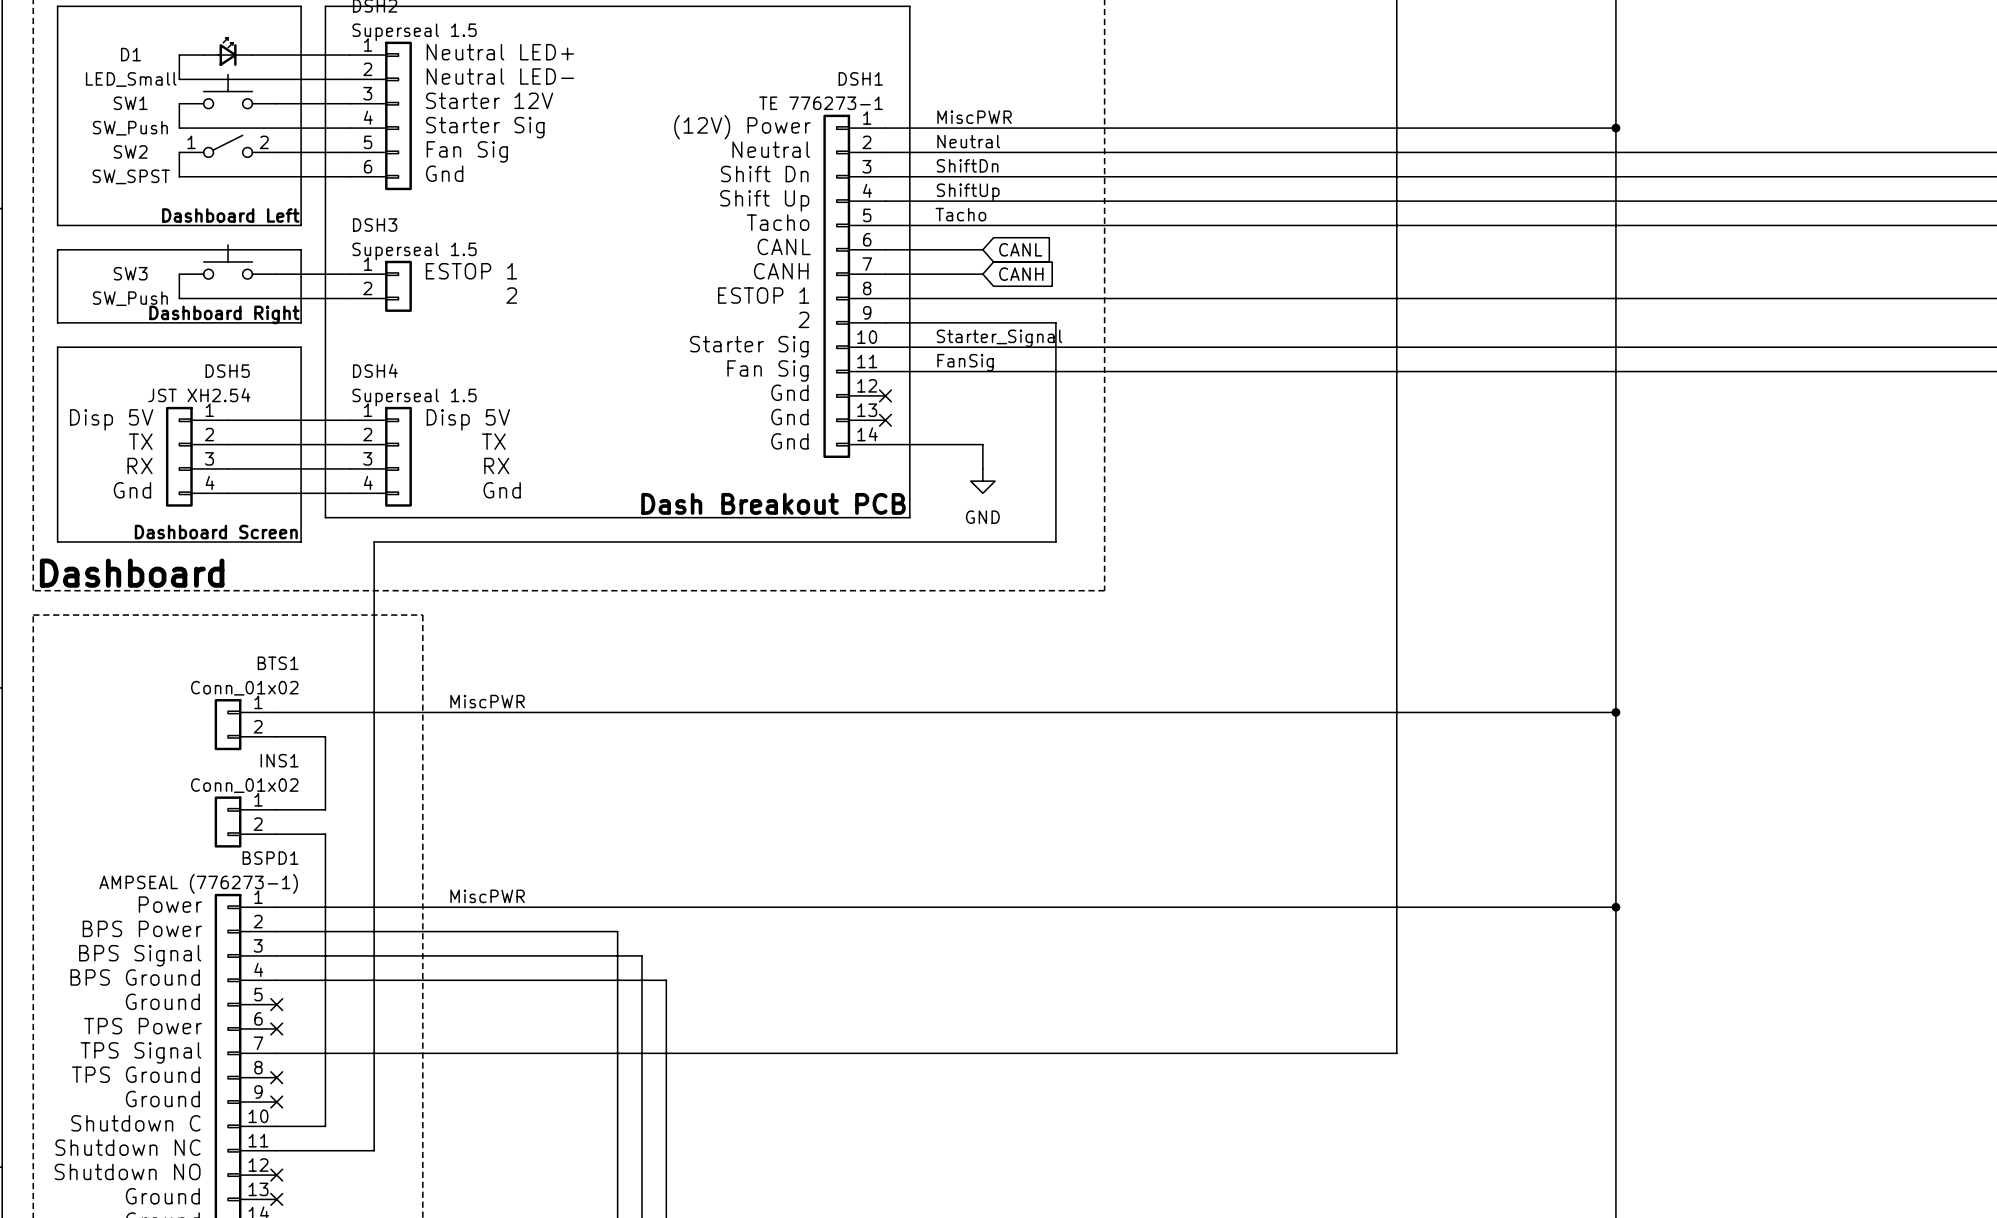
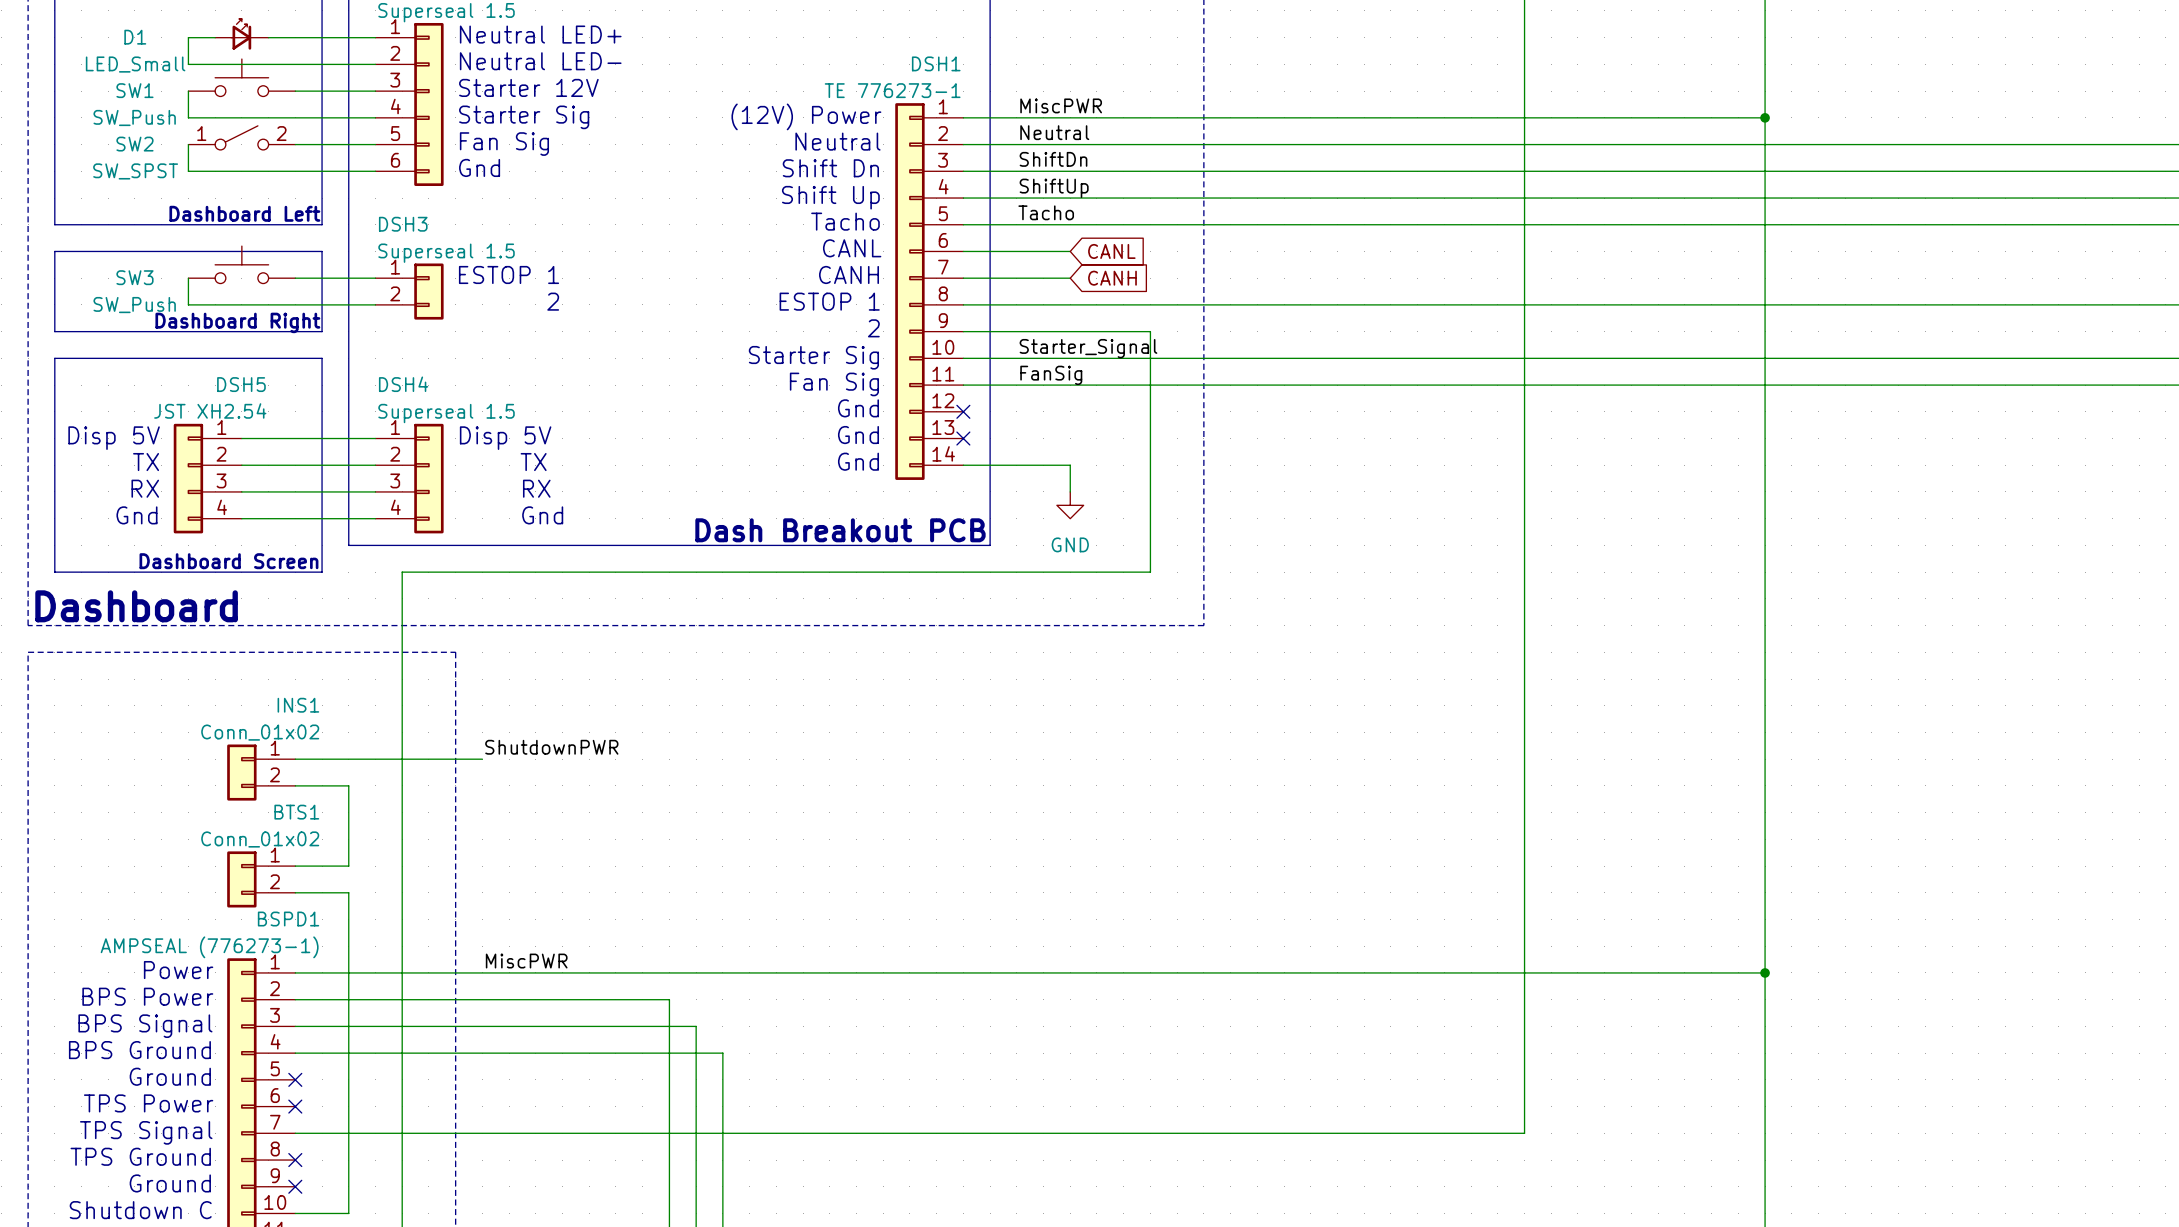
BTS1 name: BTS1 (278, 663) -> INS1 (298, 705)
label: MiscPWR (487, 701) -> ShutdownPWR (551, 747)
wire: (447, 712) (1615, 712) -> none
junction: (1615, 712) -> none
INS1 name: INS1 (279, 760) -> BTS1 (296, 812)

